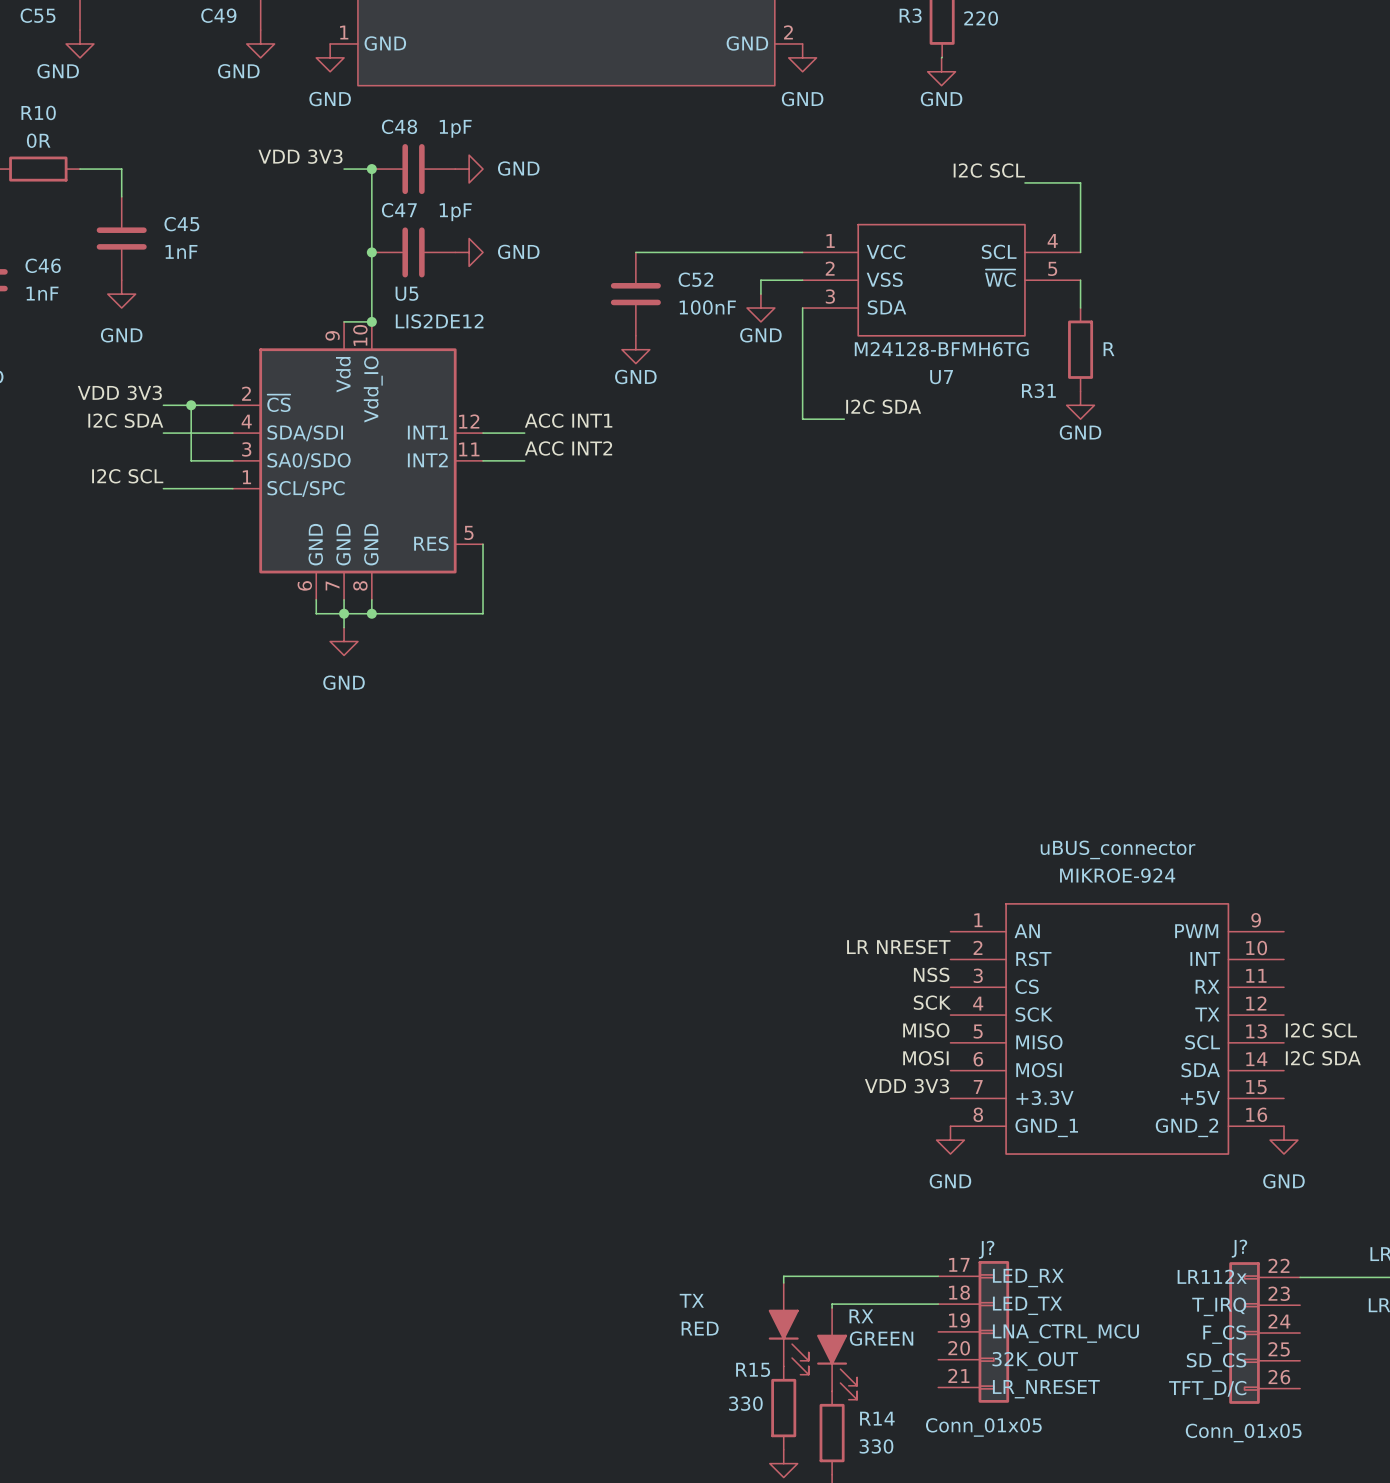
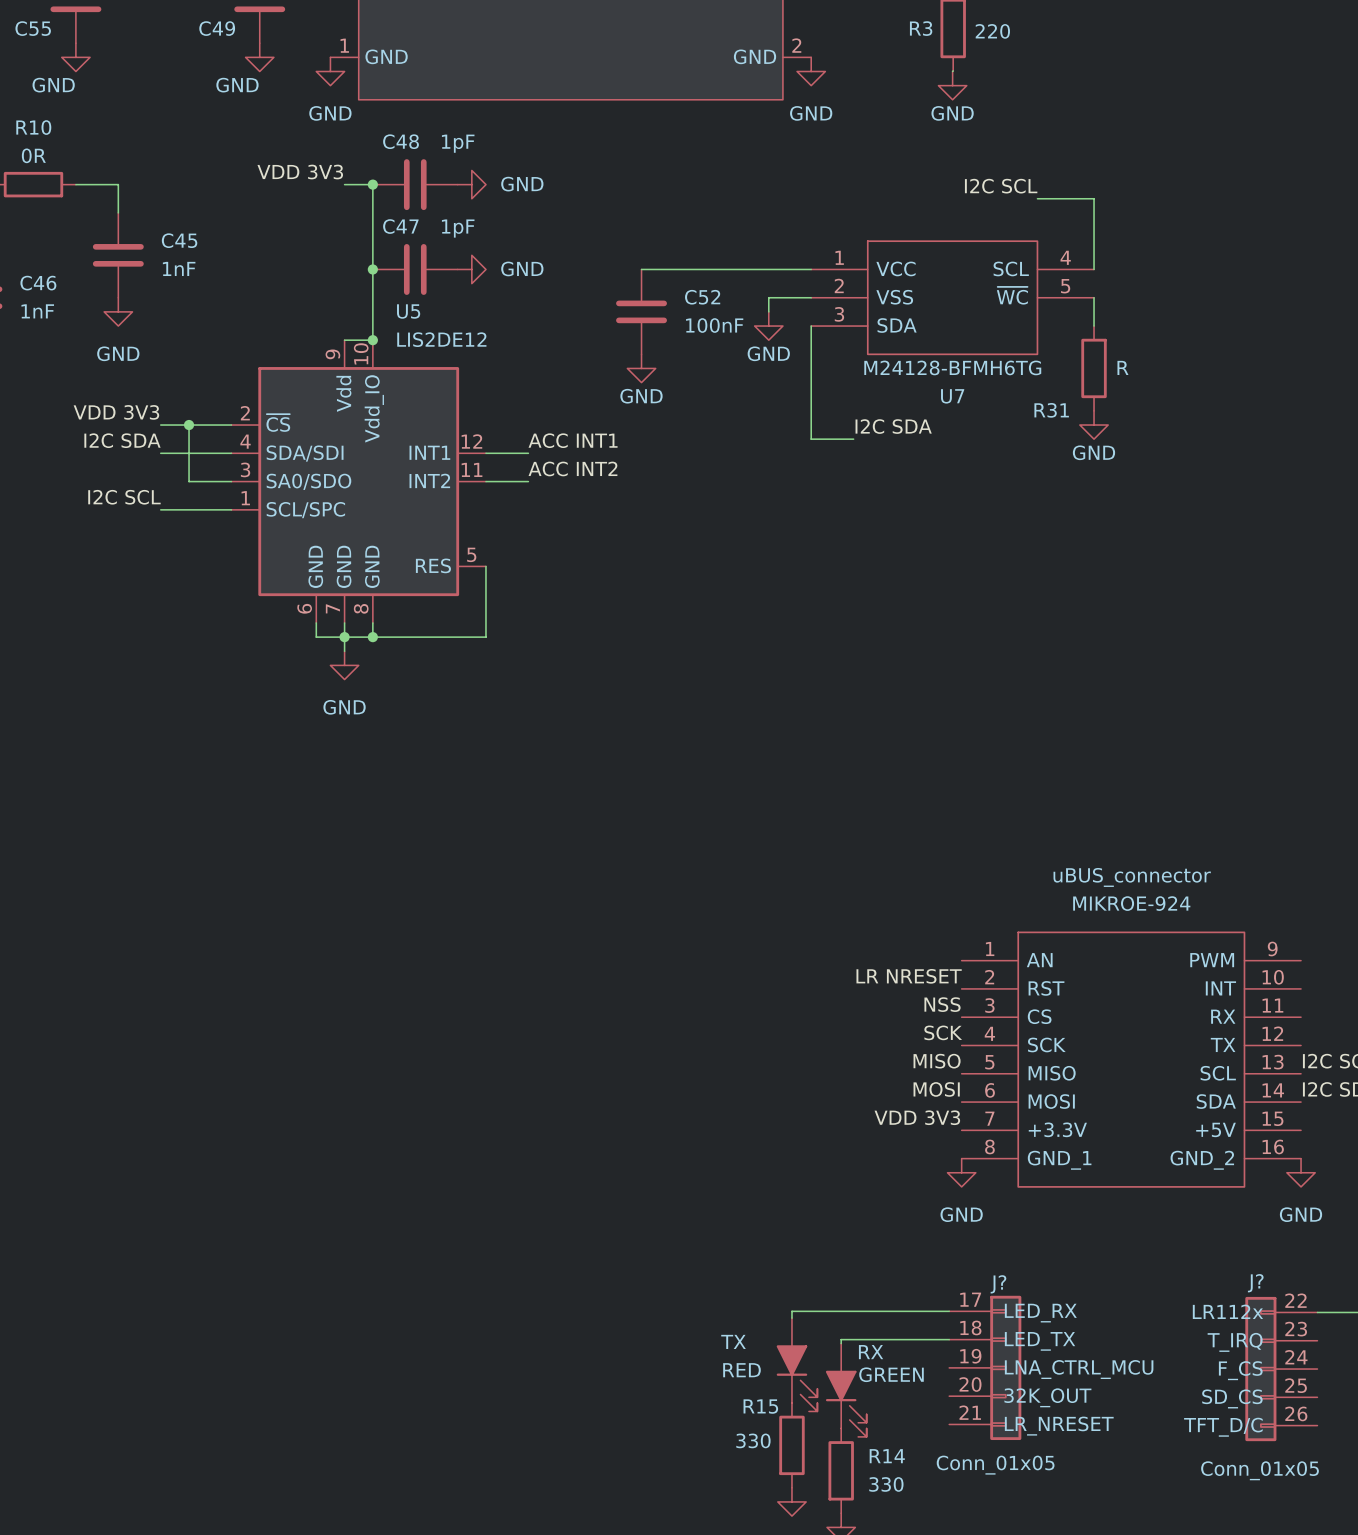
TX name position: TX (691, 1300) -> TX (733, 1341)
TX value position: RED (700, 1328) -> RED (741, 1370)

